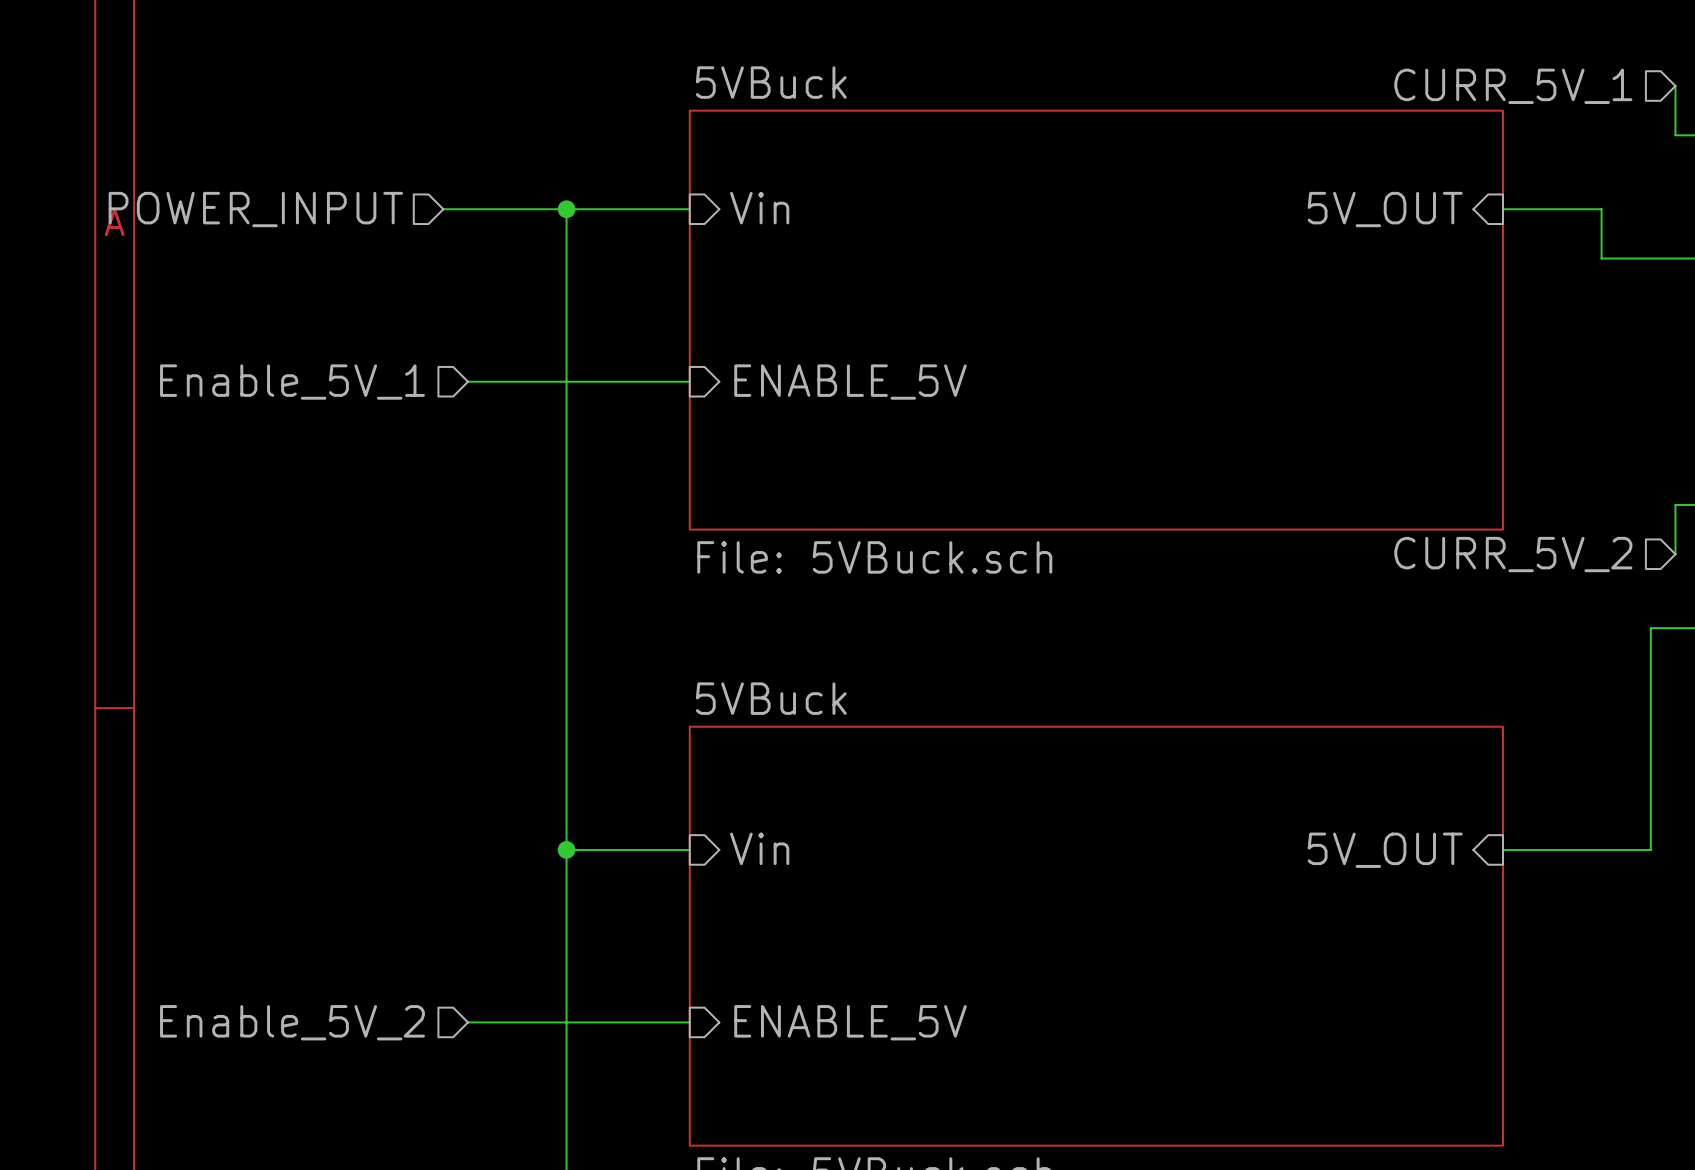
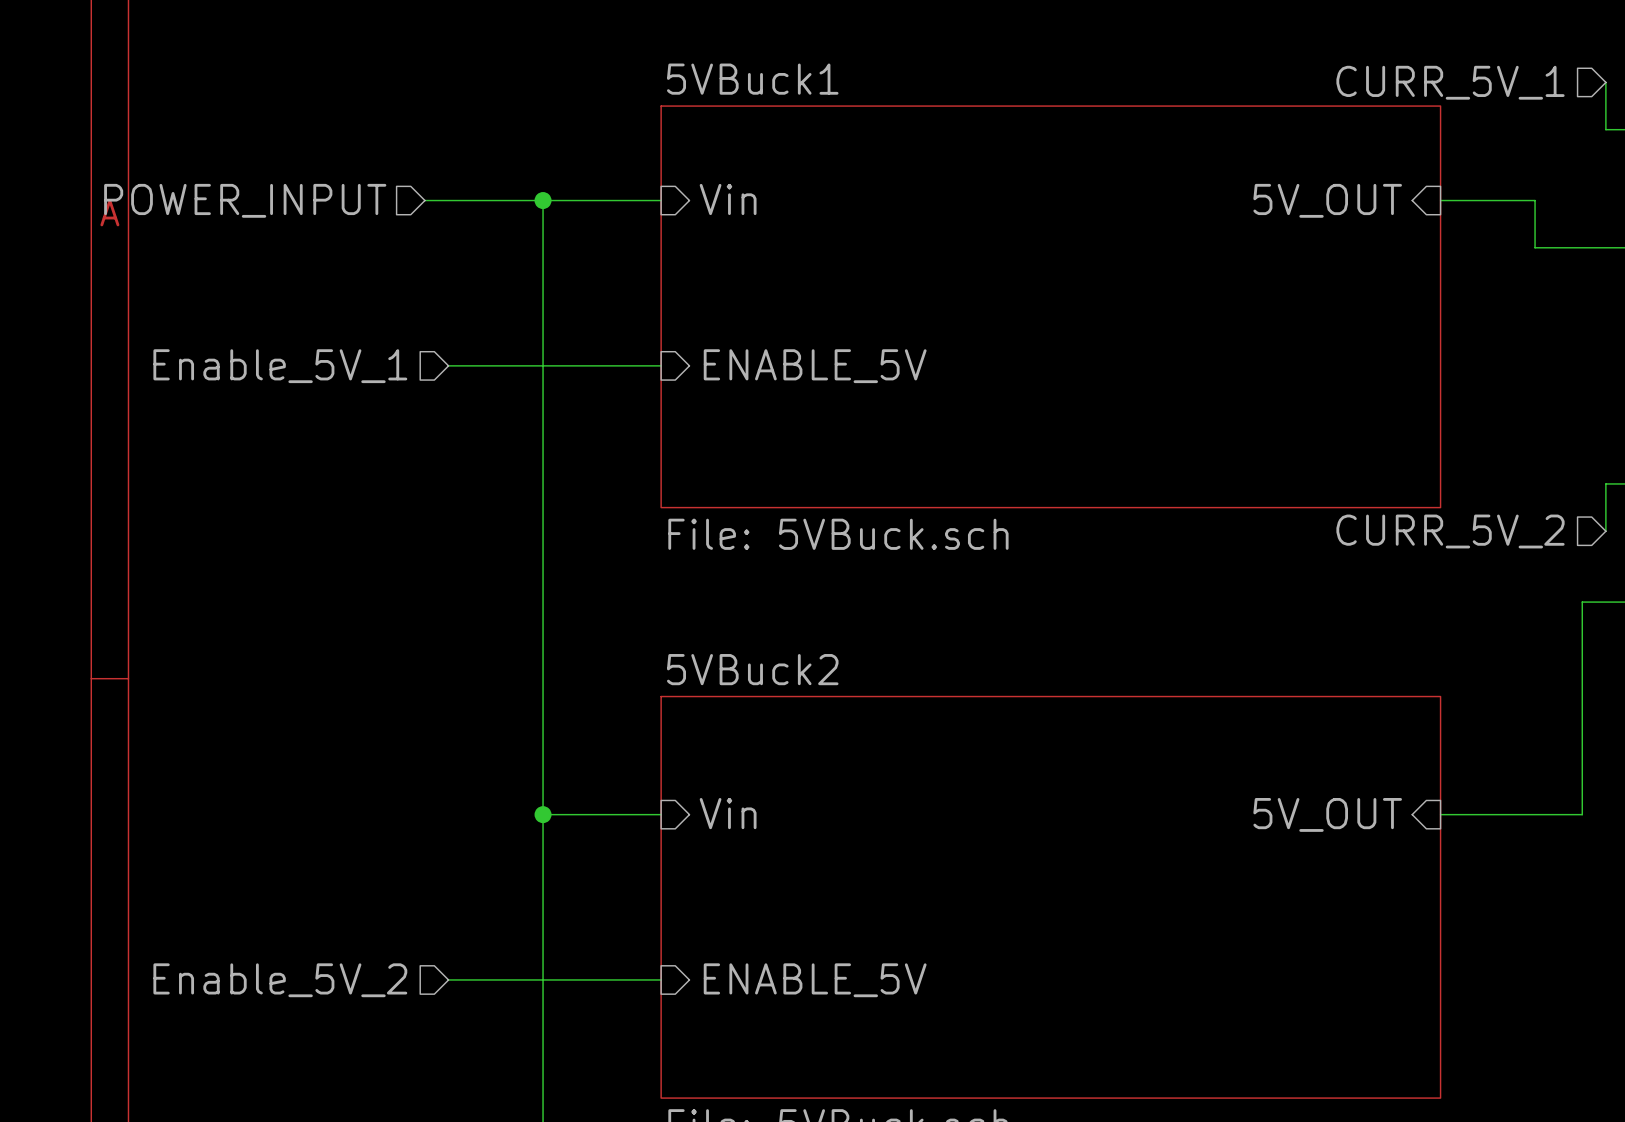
sheet 5VBuck name: 5VBuck (771, 82) -> 5VBuck1 (752, 79)
sheet 5VBuck name: 5VBuck (771, 698) -> 5VBuck2 (752, 669)

